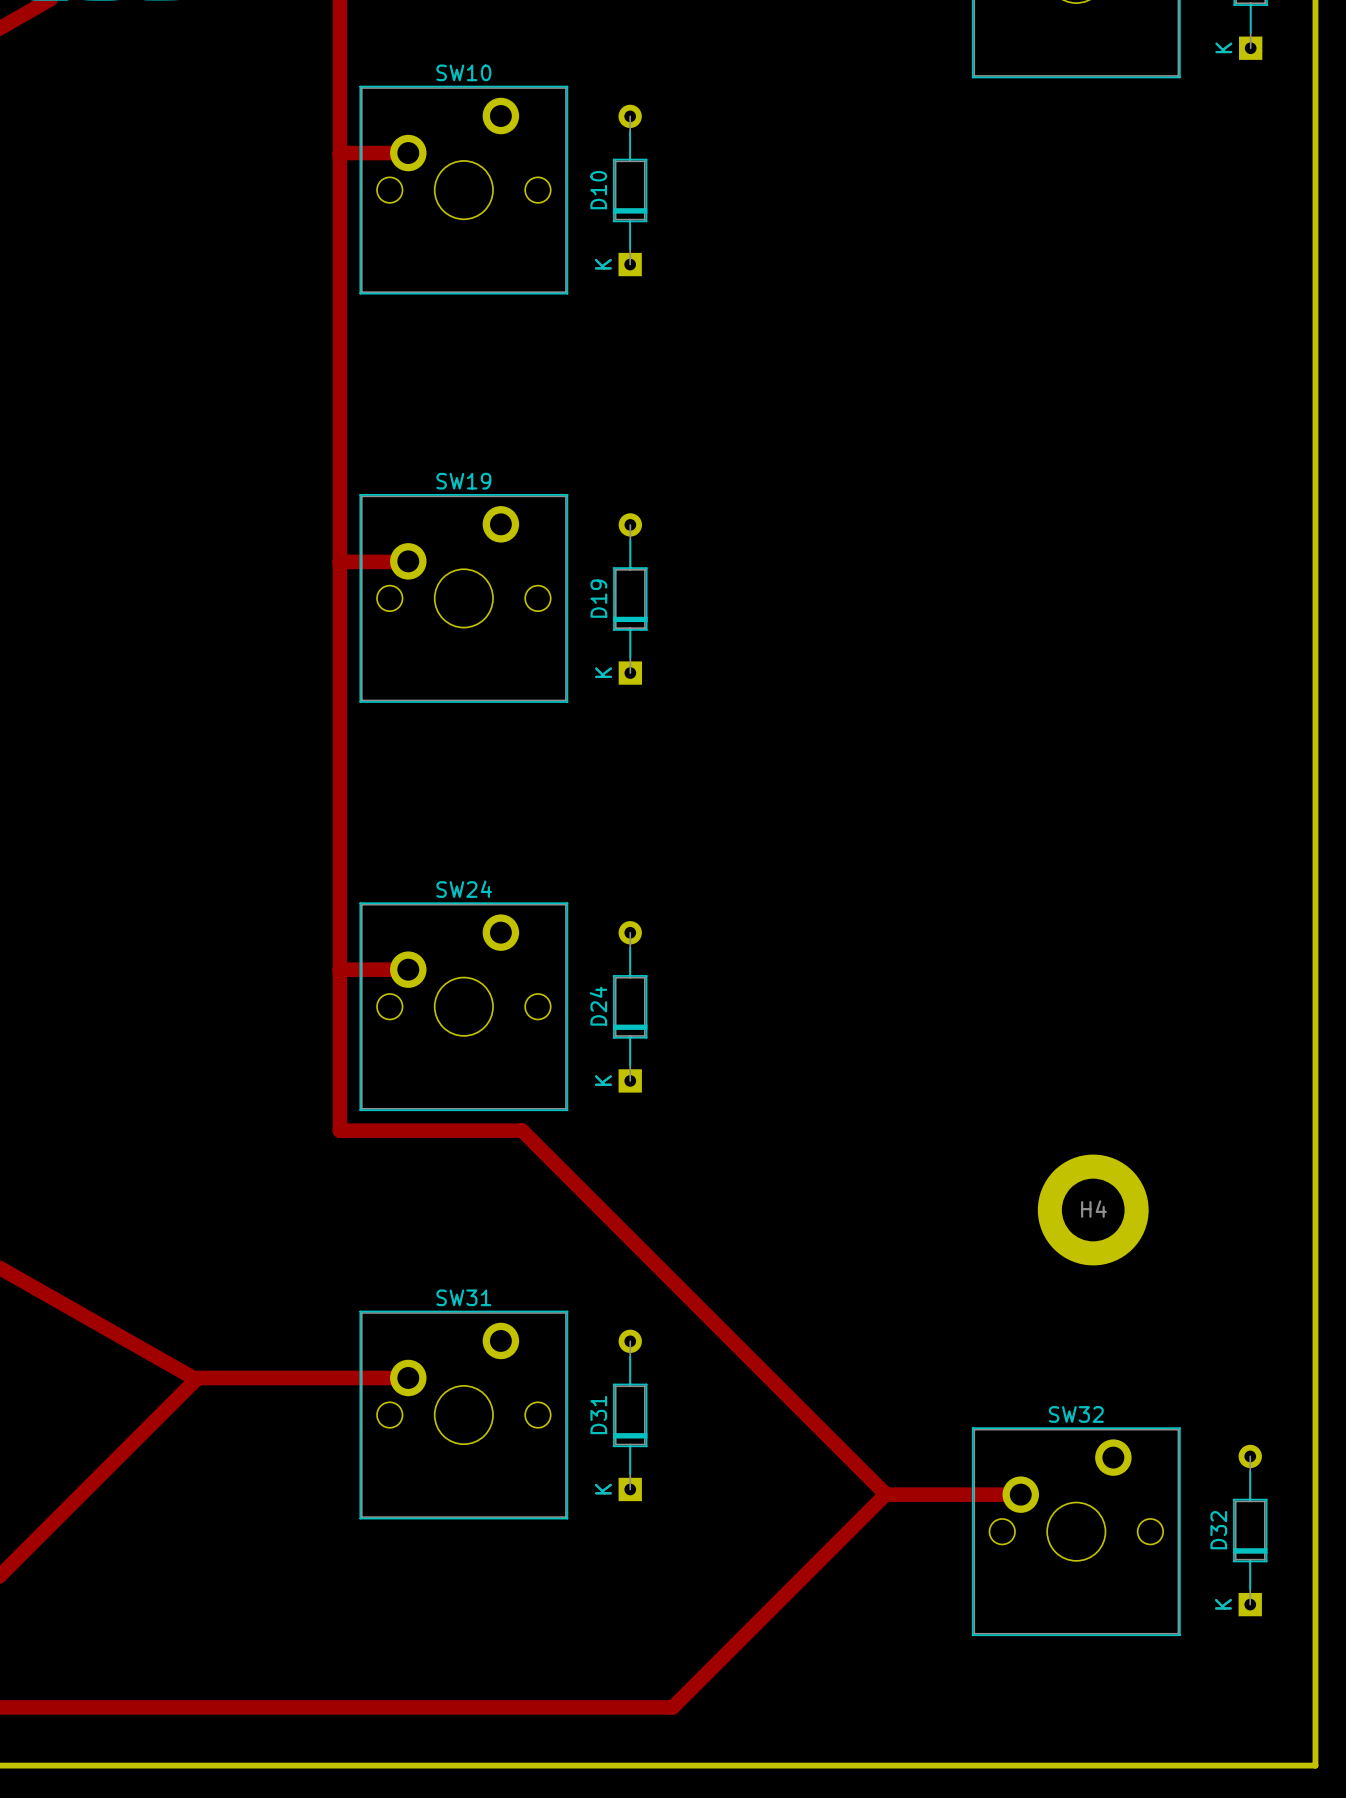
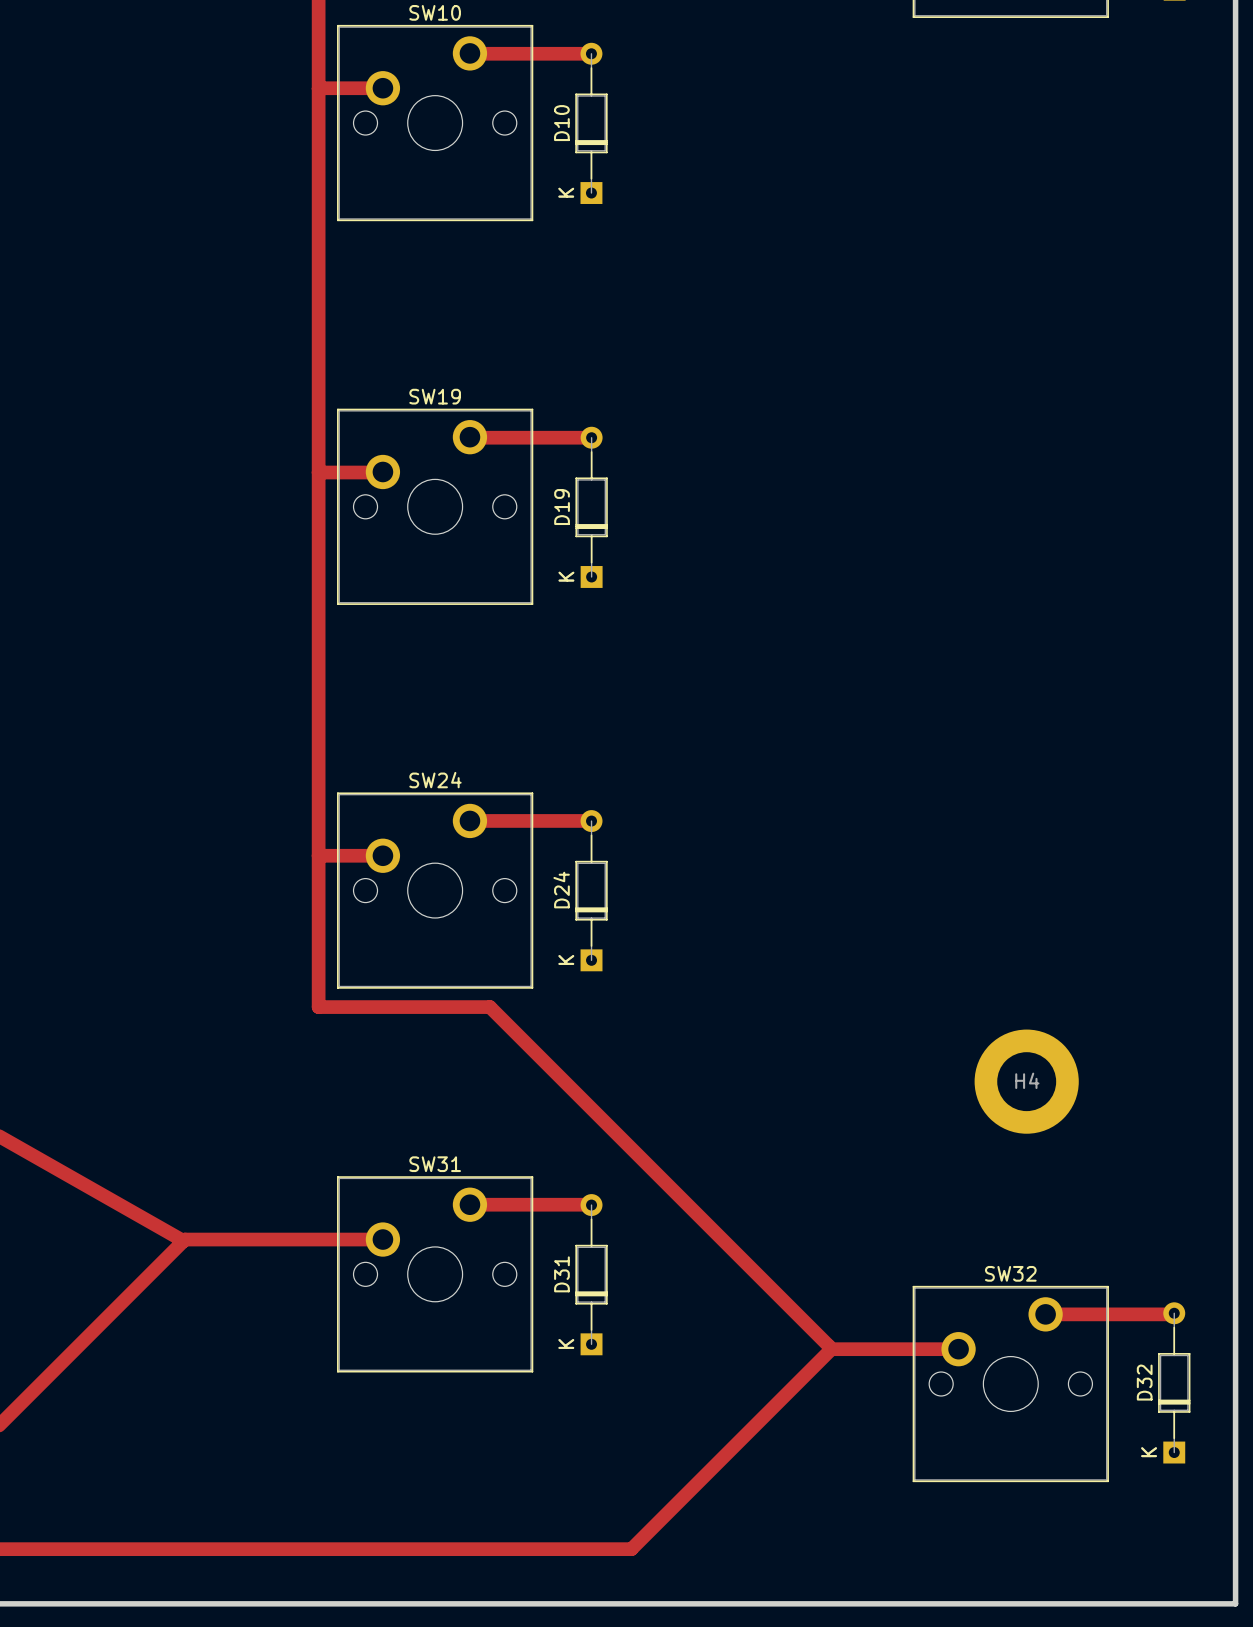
track: none -> (470, 53) (586, 53)
track: none -> (470, 437) (592, 437)
track: none -> (469, 820) (591, 820)
track: none -> (469, 1204) (591, 1204)
track: none -> (1045, 1314) (1173, 1314)

